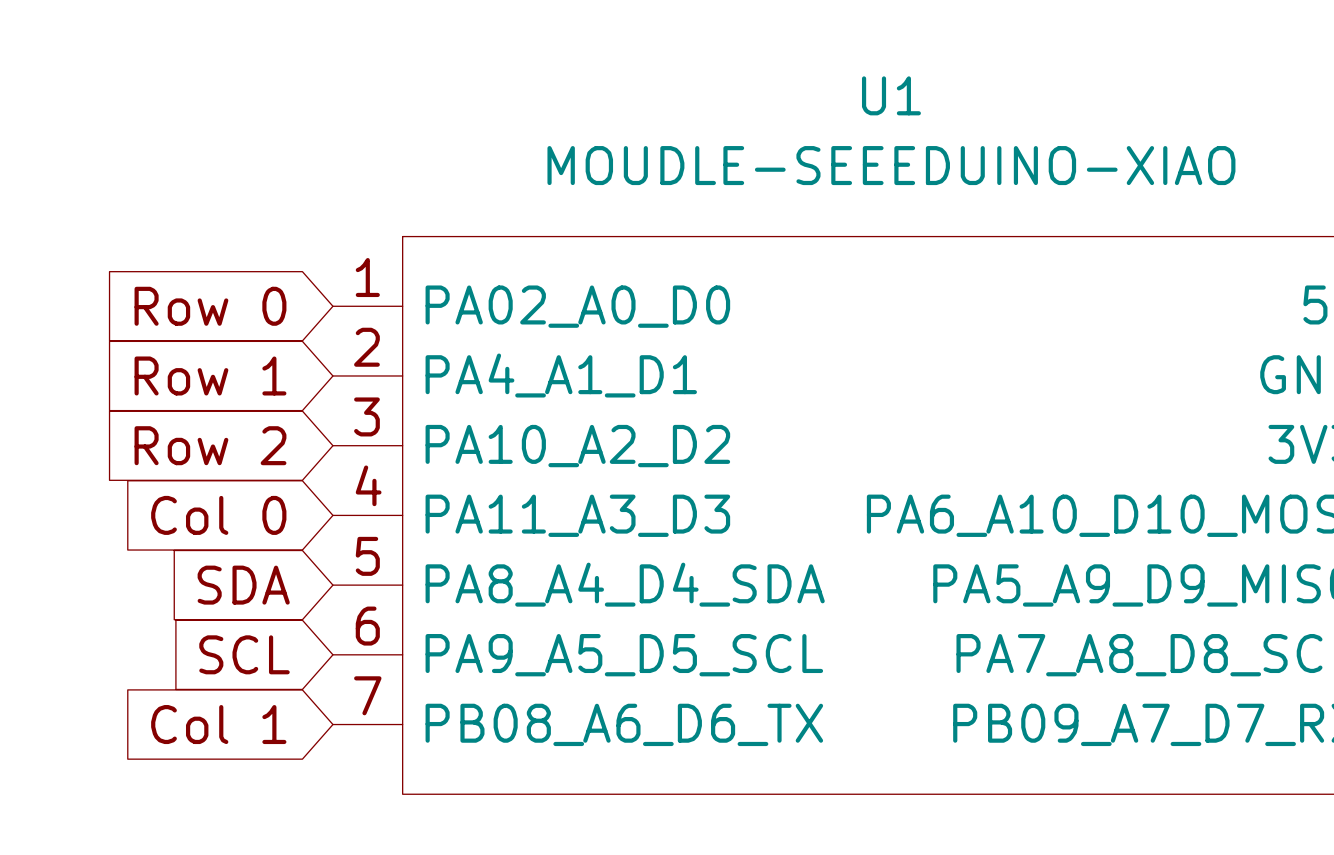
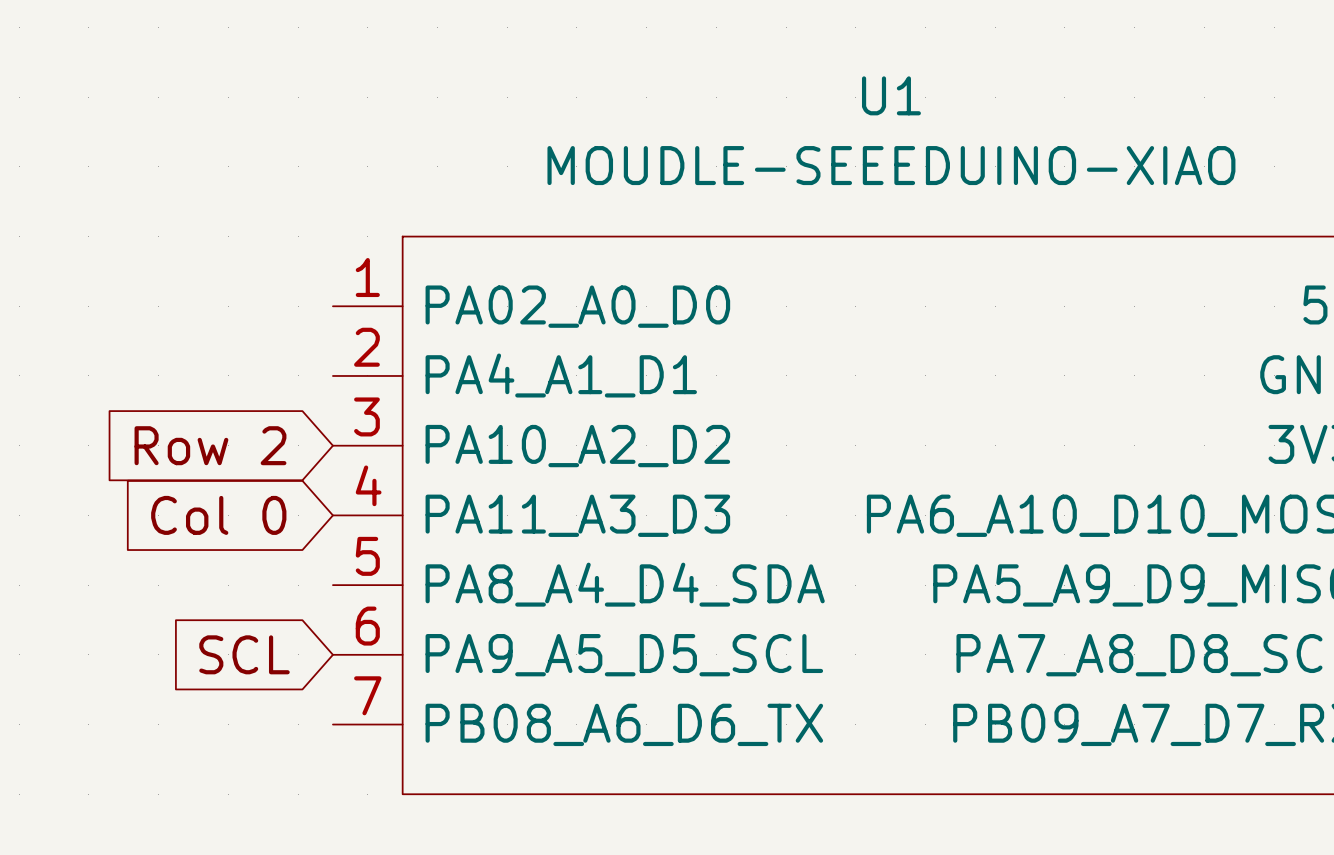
global label: Row 0 (210, 306) -> none
global label: Row 1 (210, 375) -> none
global label: SDA (243, 585) -> none
global label: Col 1 (218, 724) -> none

